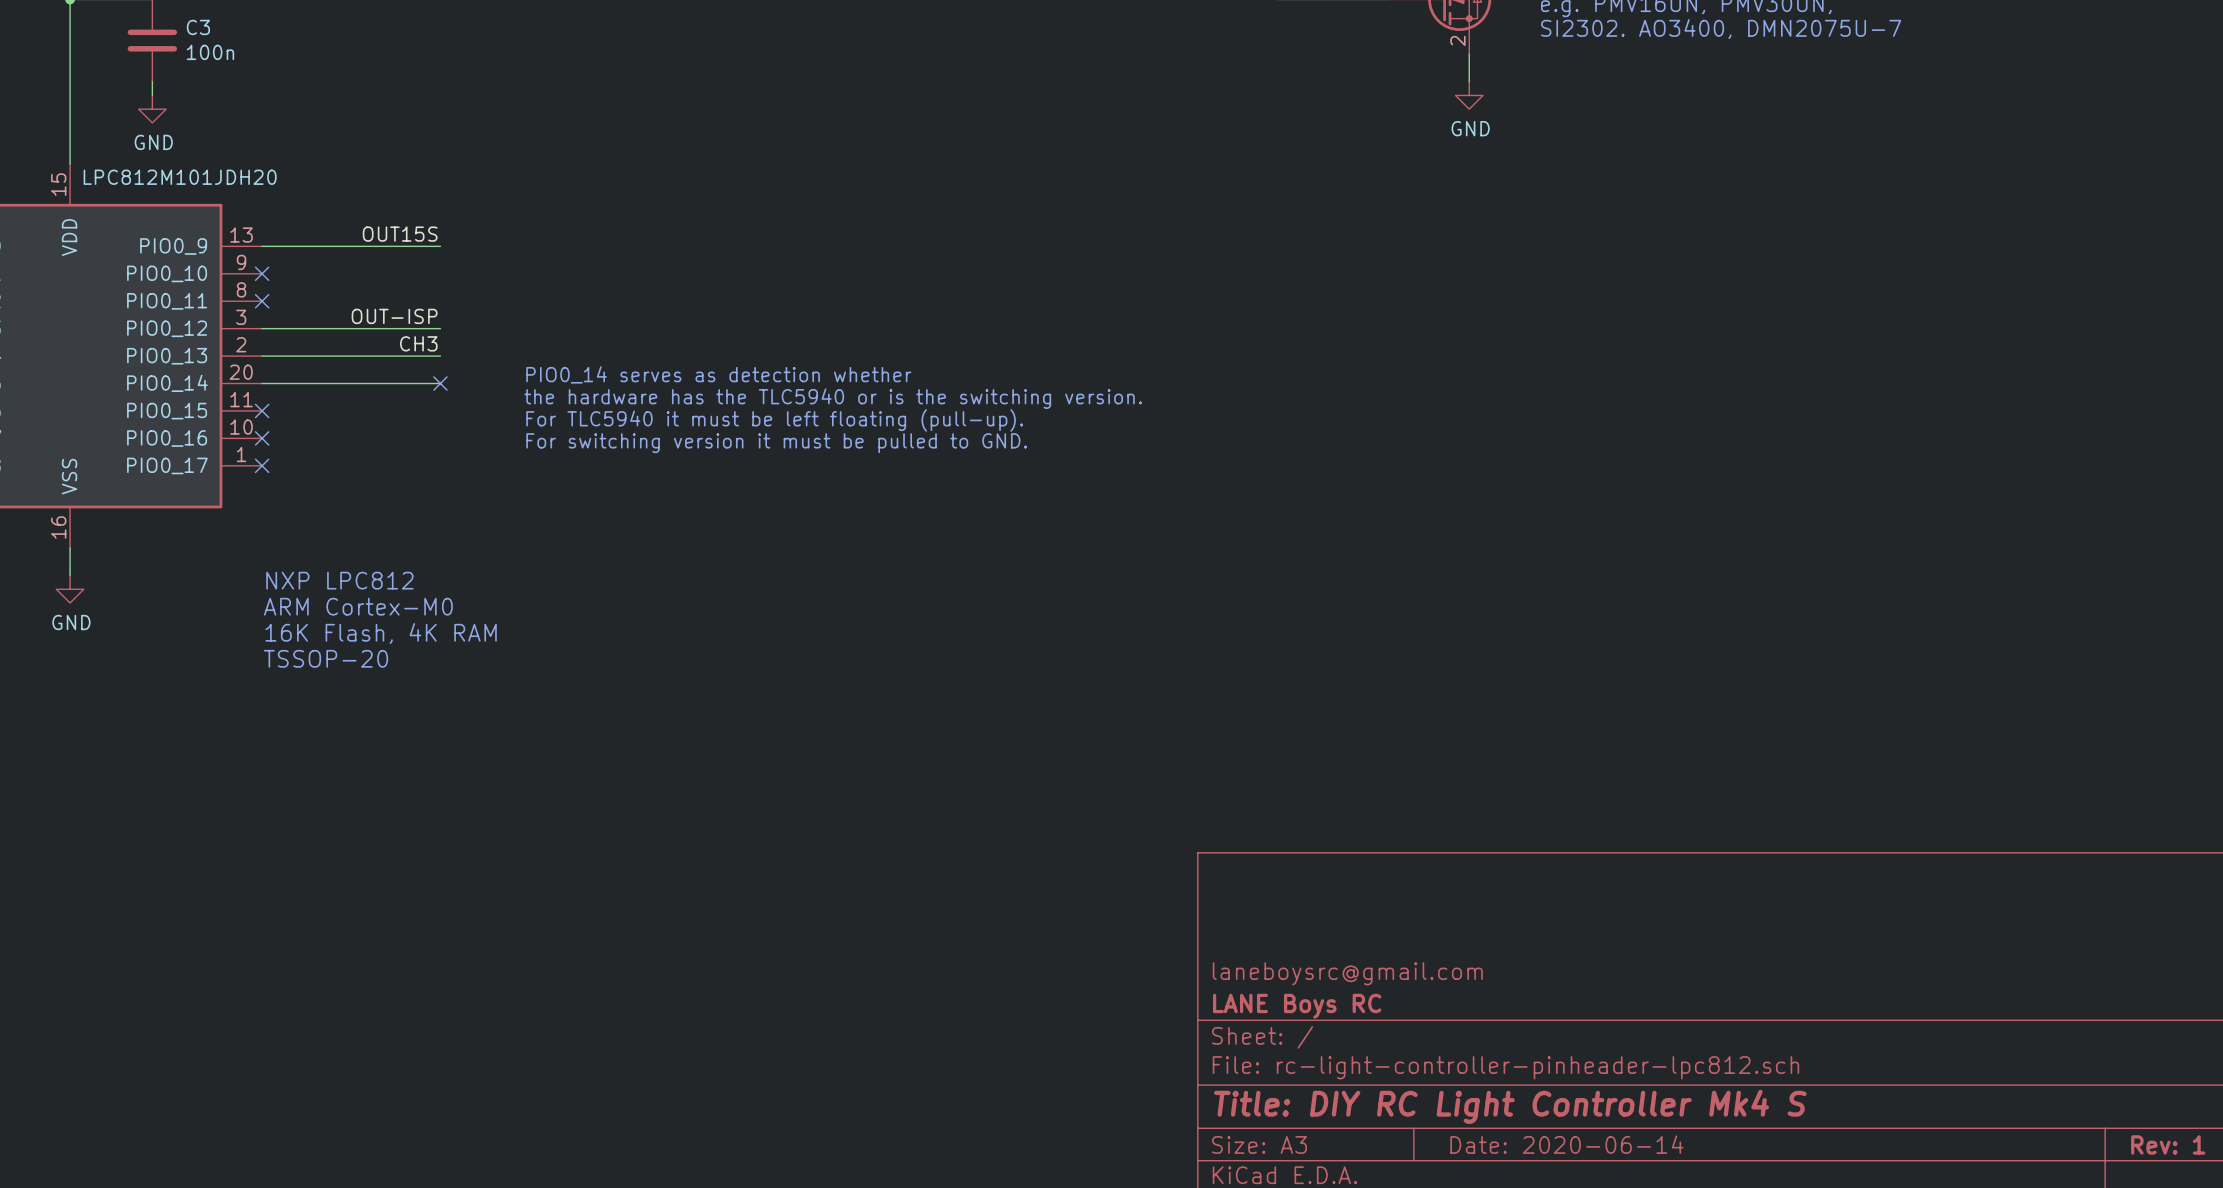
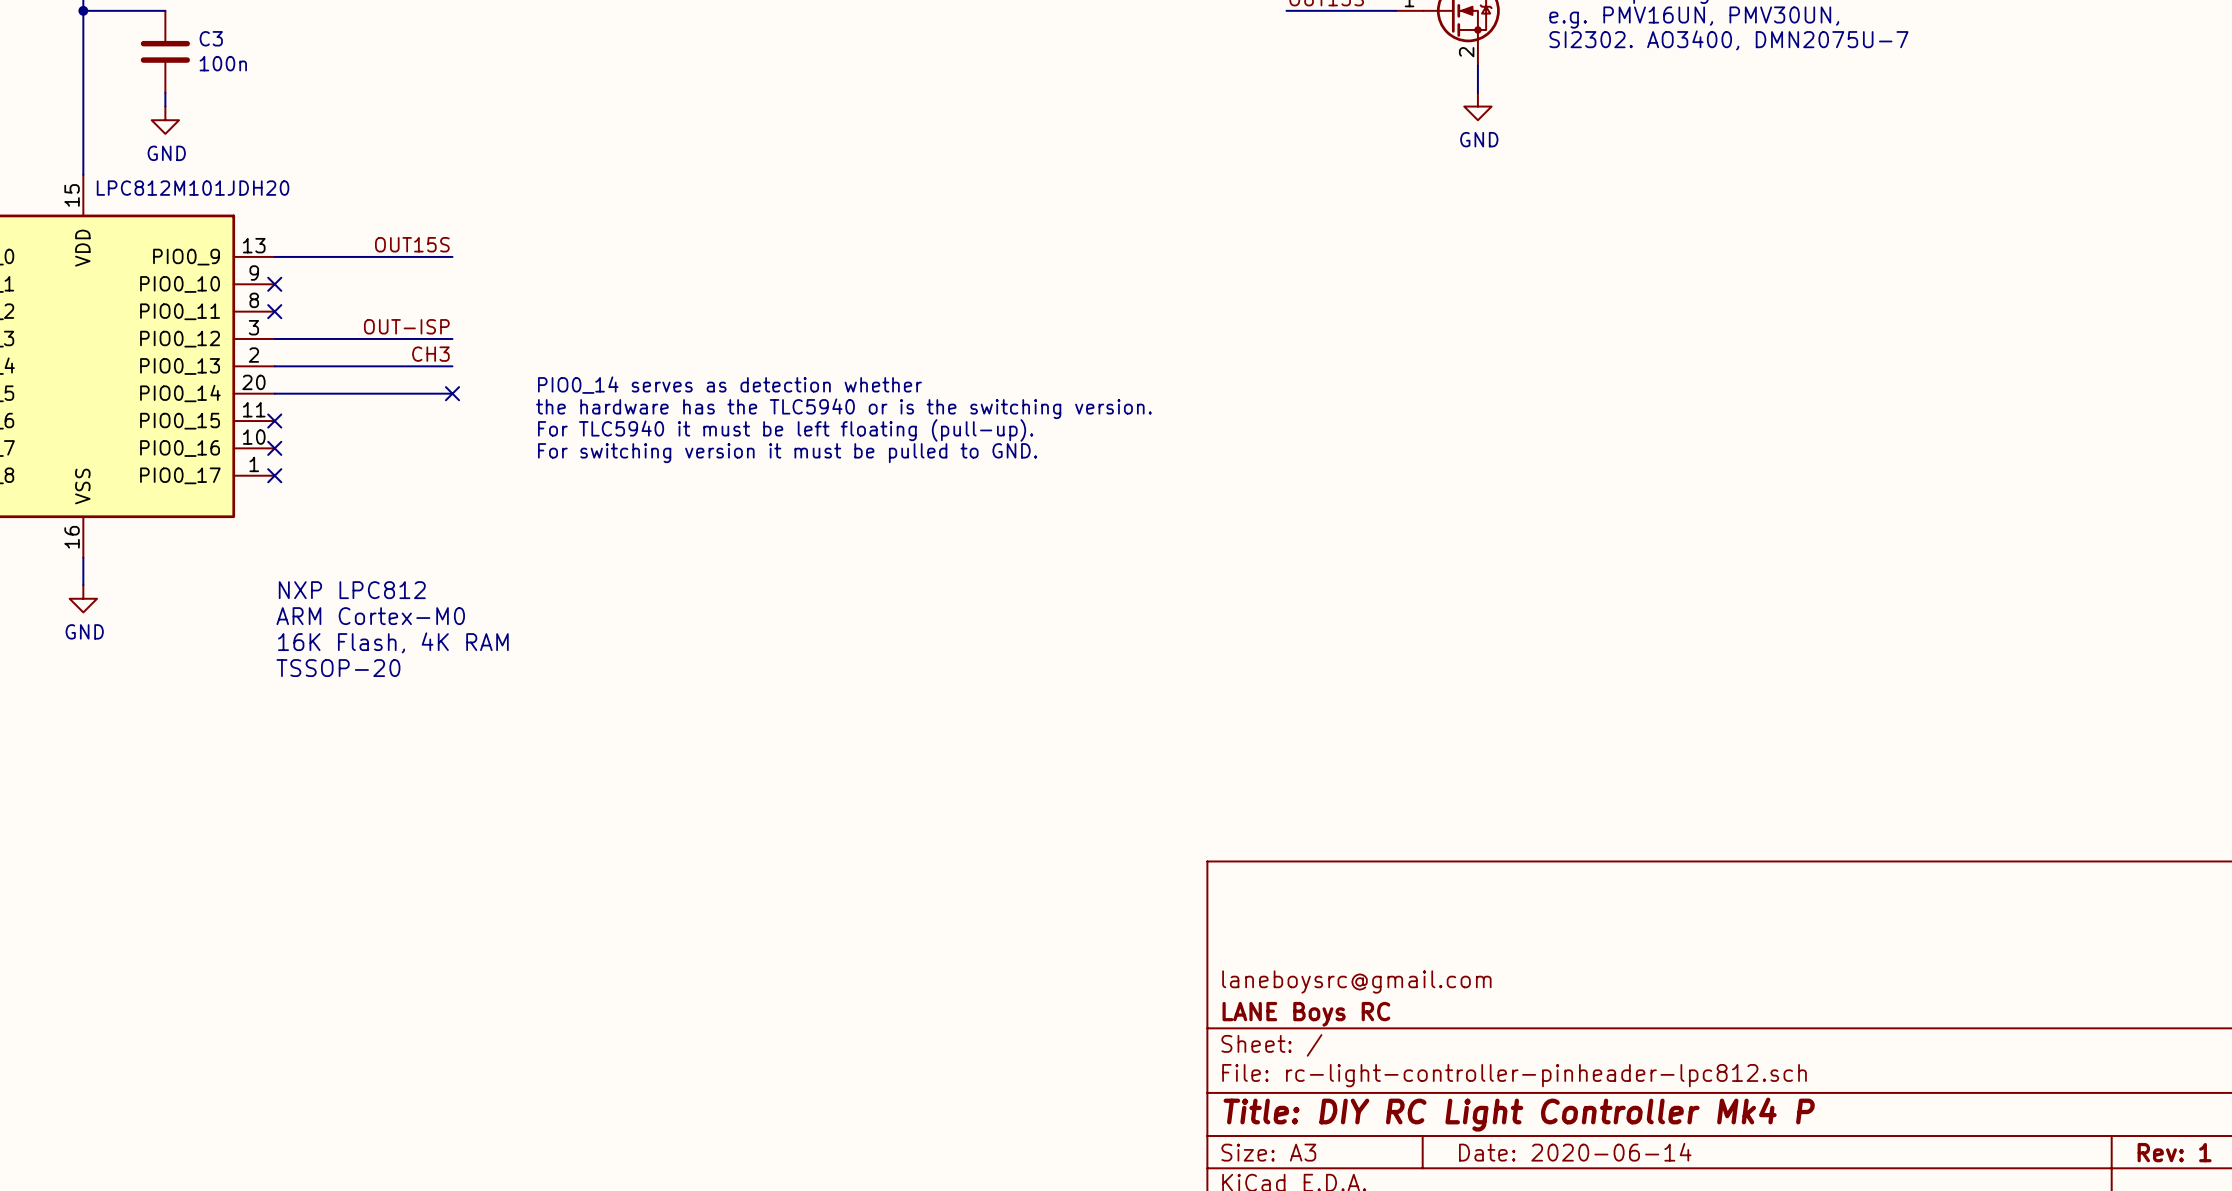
title block: Title: DIY RC Light Controller Mk4 S (1510, 1106) -> Title: DIY RC Light Controller Mk4 P (1519, 1114)

